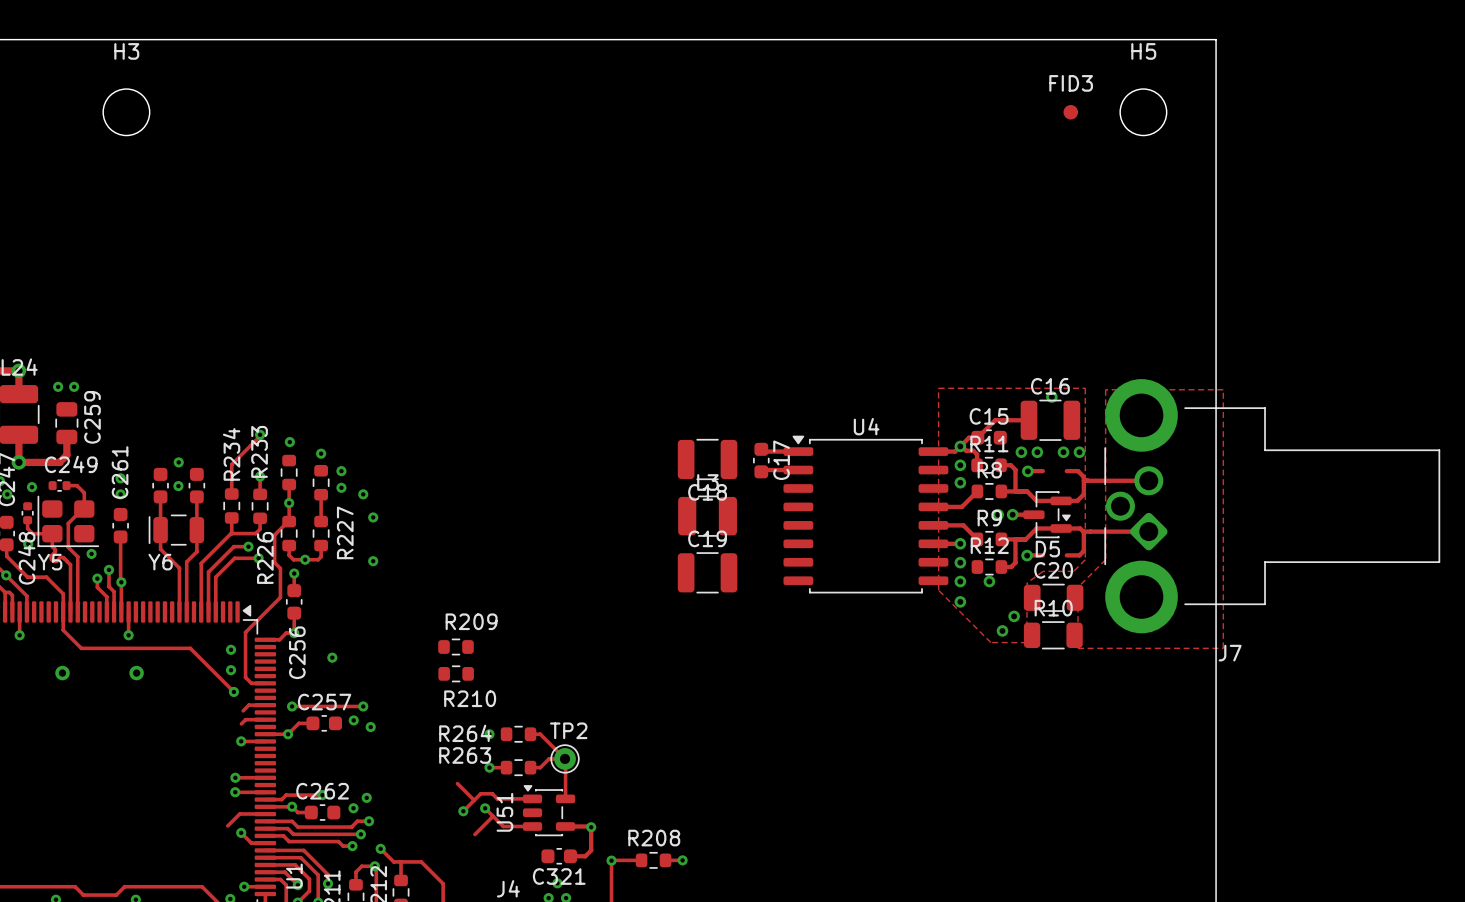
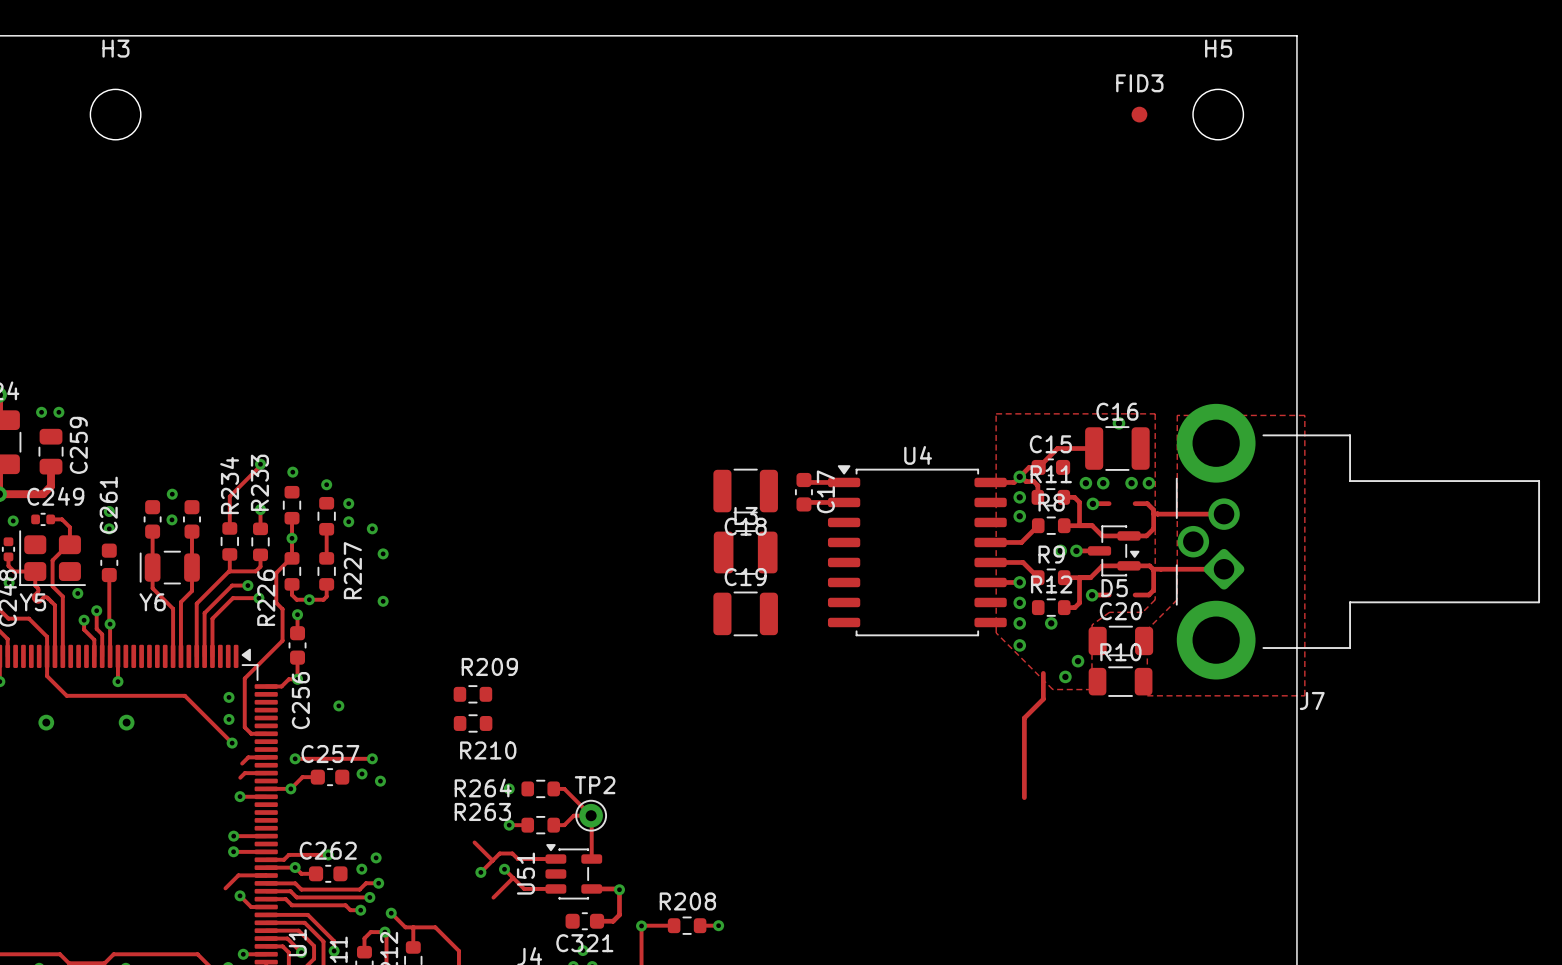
track: none -> (1043, 673) (1043, 699) (1024, 718) (1024, 797)

